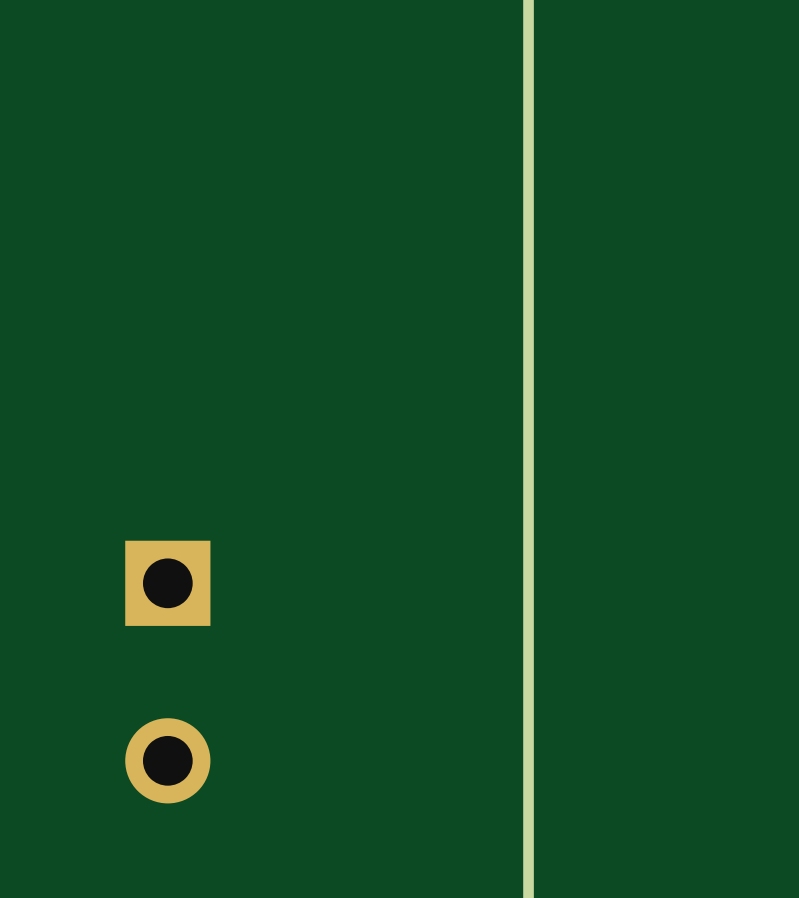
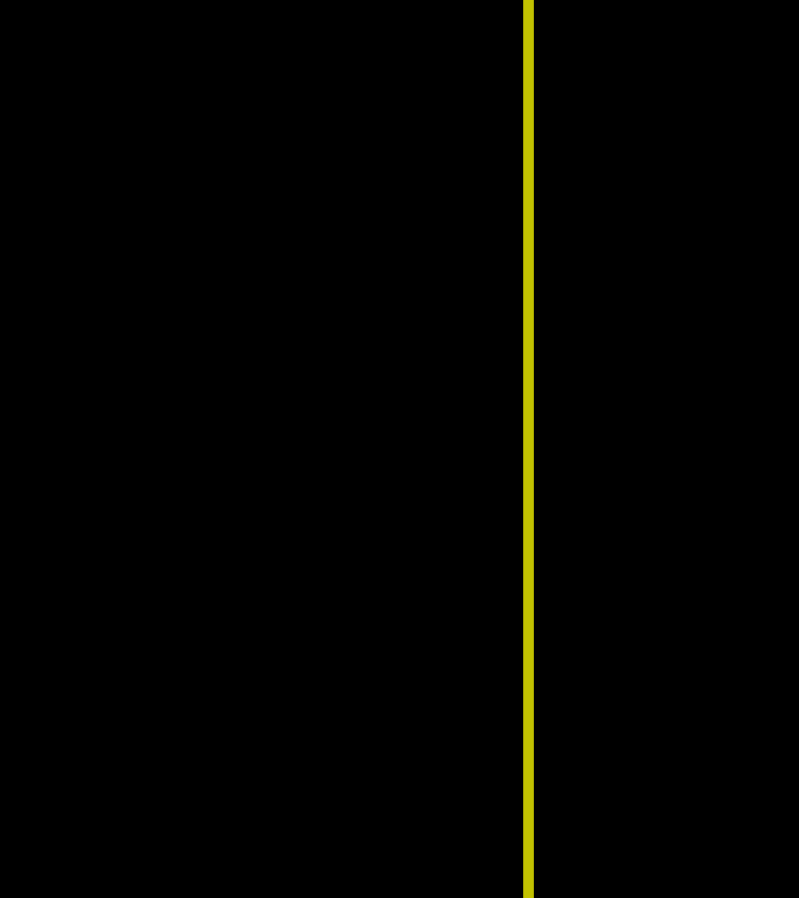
part: (167, 672) -> none

